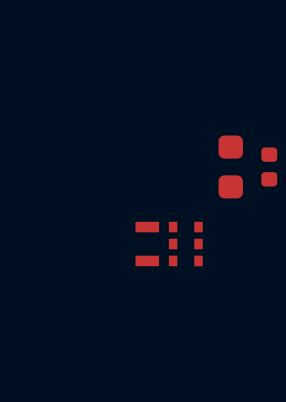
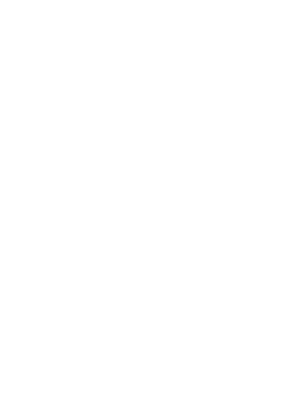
part: (230, 166) -> none
part: (269, 166) -> none
part: (147, 244) -> none
part: (185, 244) -> none

